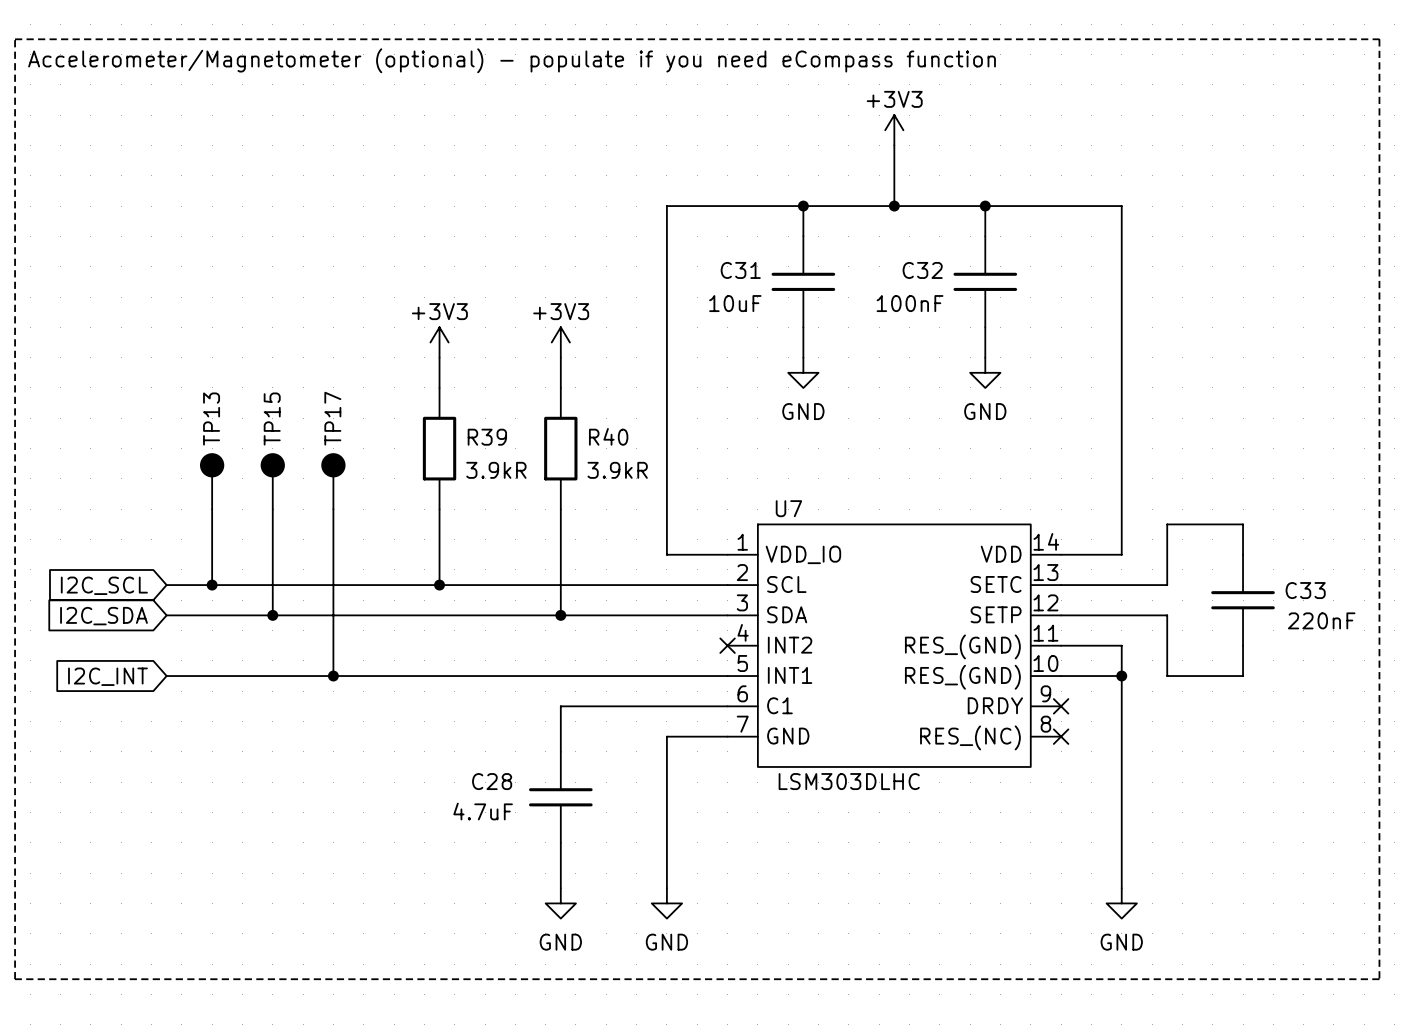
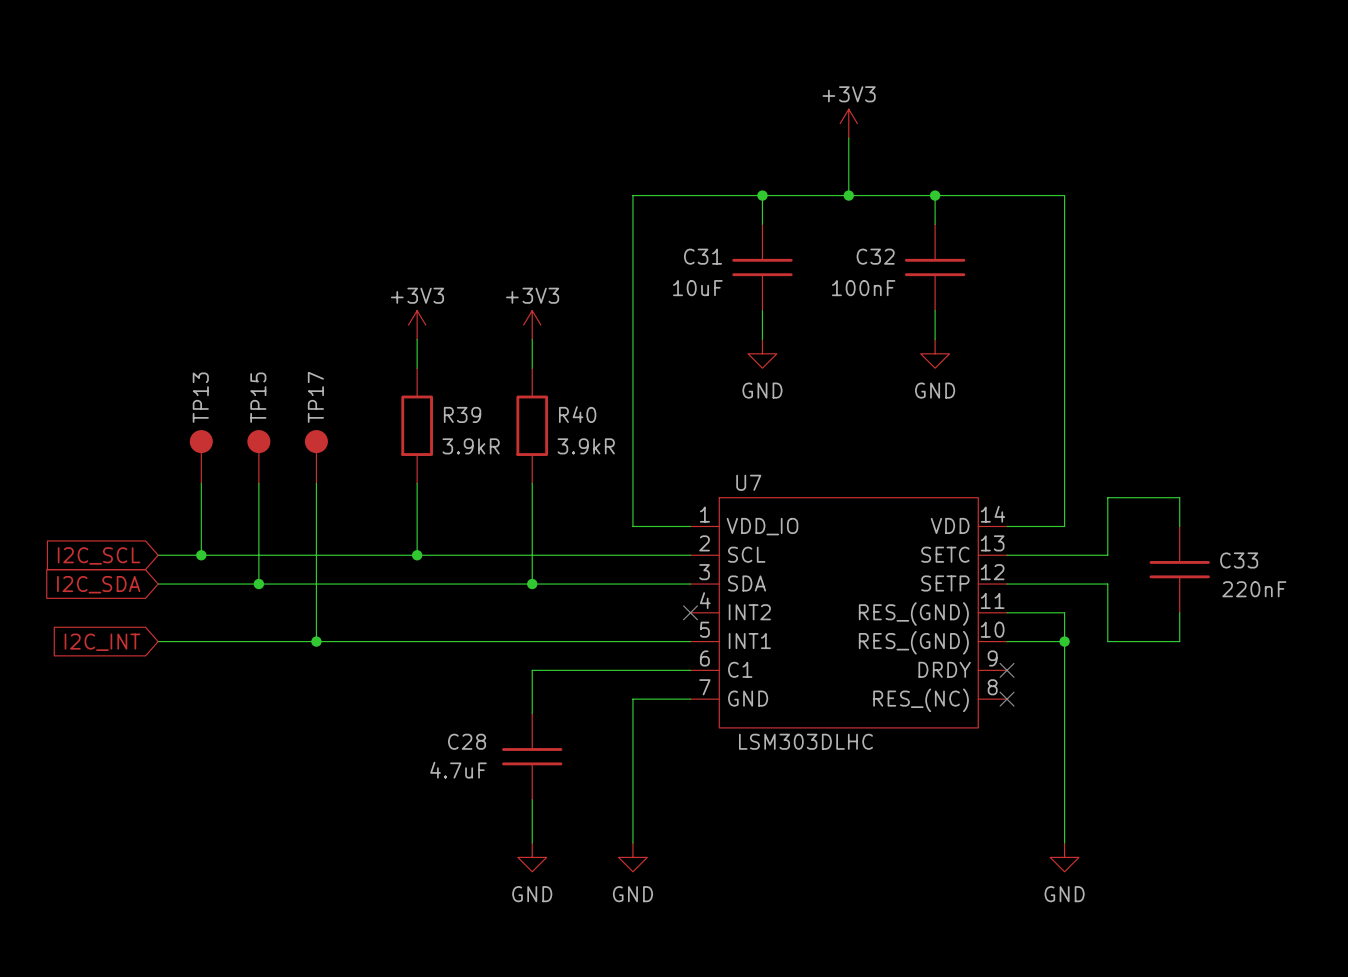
line: (15, 39) (1379, 39) (1379, 979) (15, 979) (15, 39) -> none
text: Accelerometer/Magnetometer (optional) - populate if you need eCompass function (512, 60) -> none

